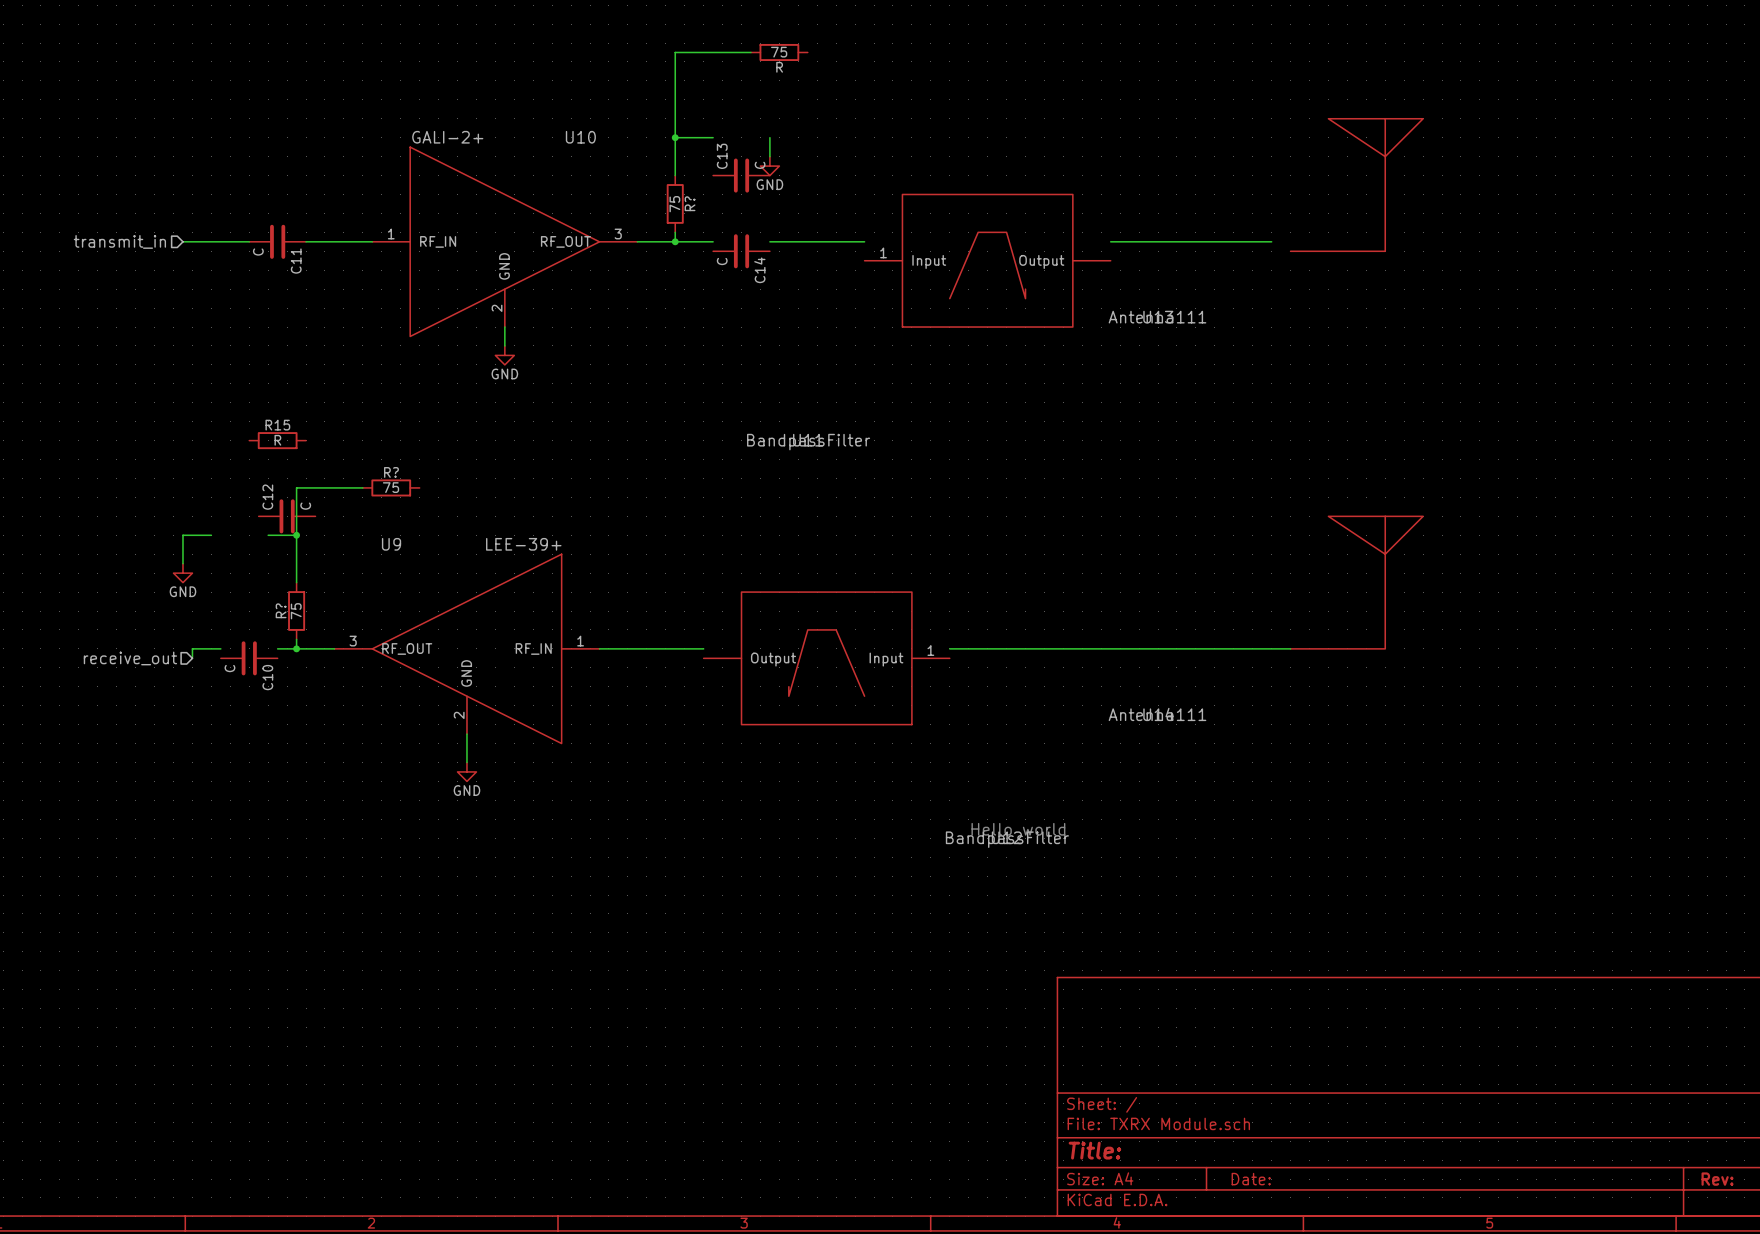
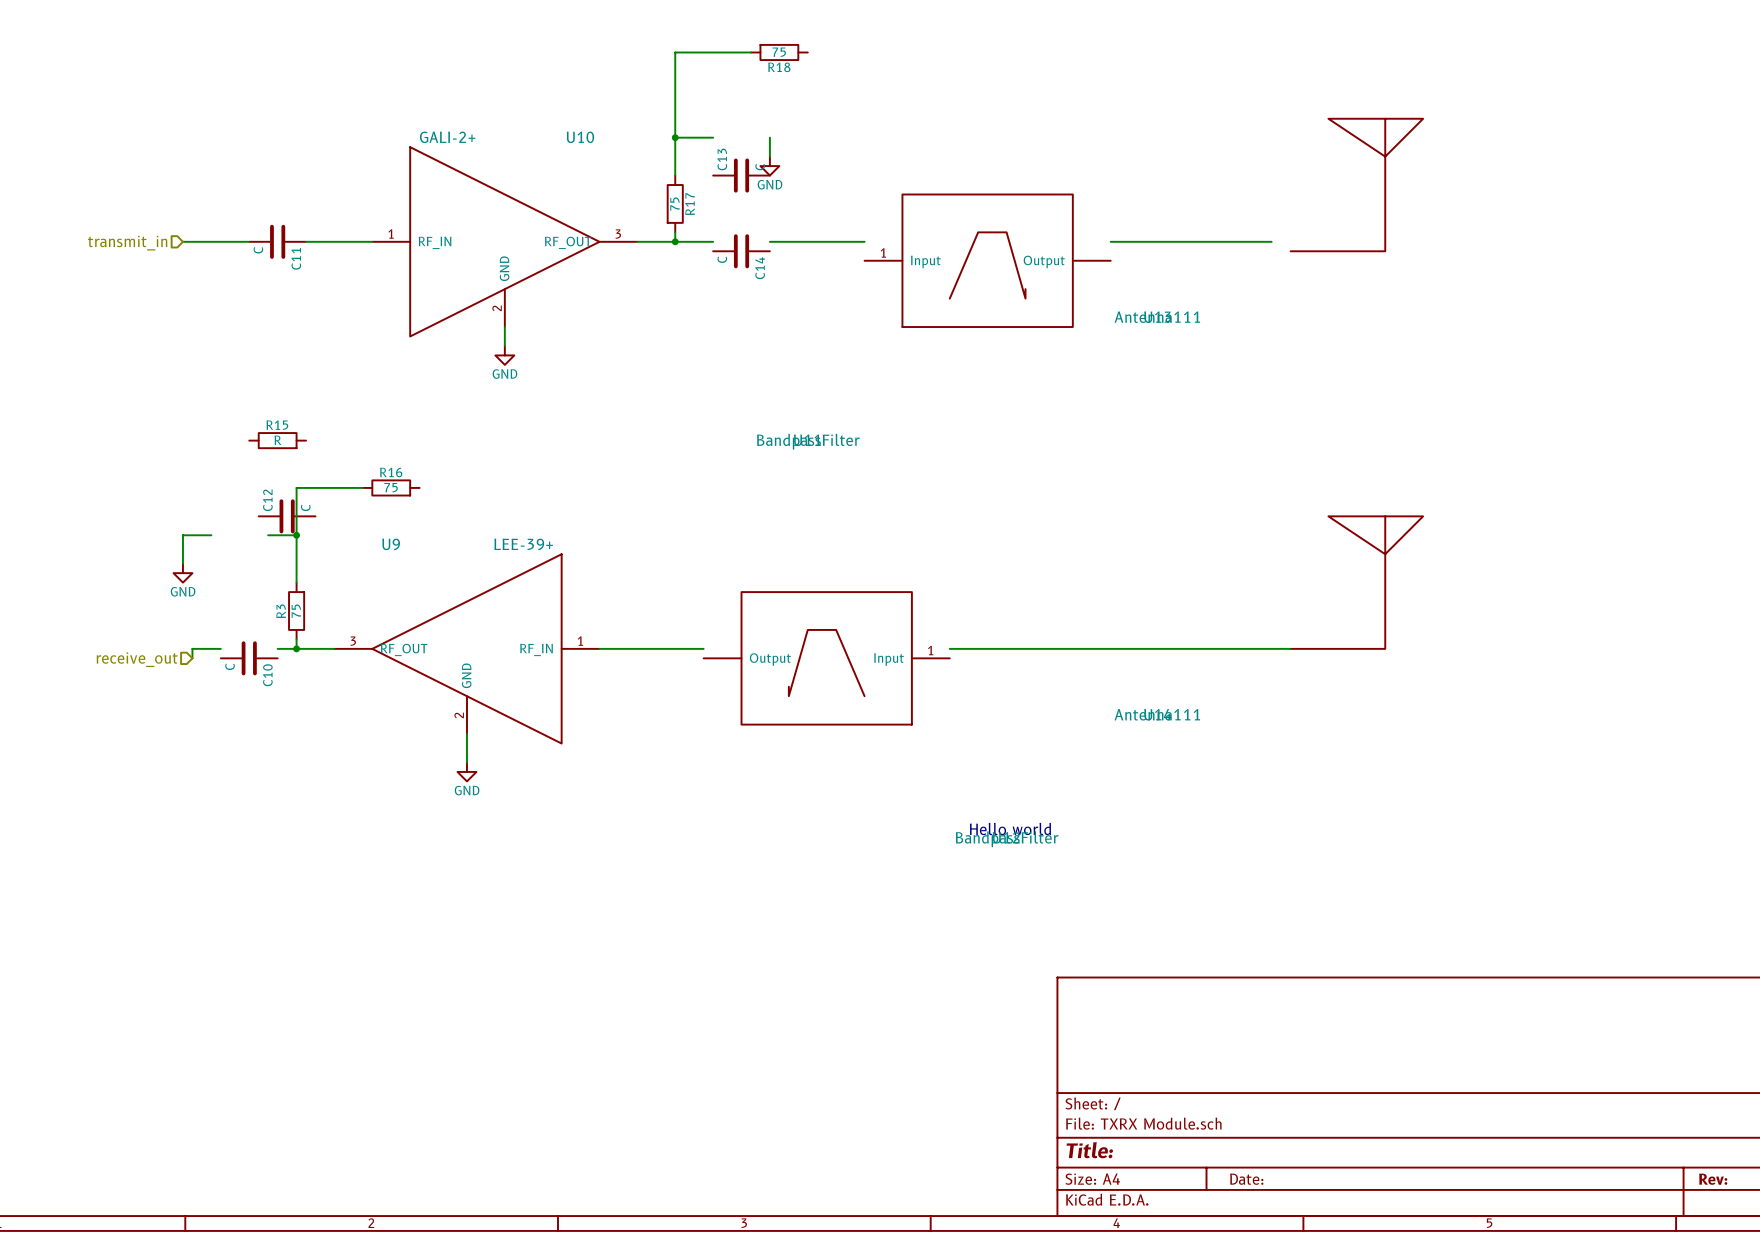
R name: R (779, 67) -> R18 (779, 67)
R? name: R? (690, 203) -> R17 (690, 204)
R? name: R? (391, 472) -> R16 (391, 472)
R? name: R? (281, 610) -> R3 (281, 611)

